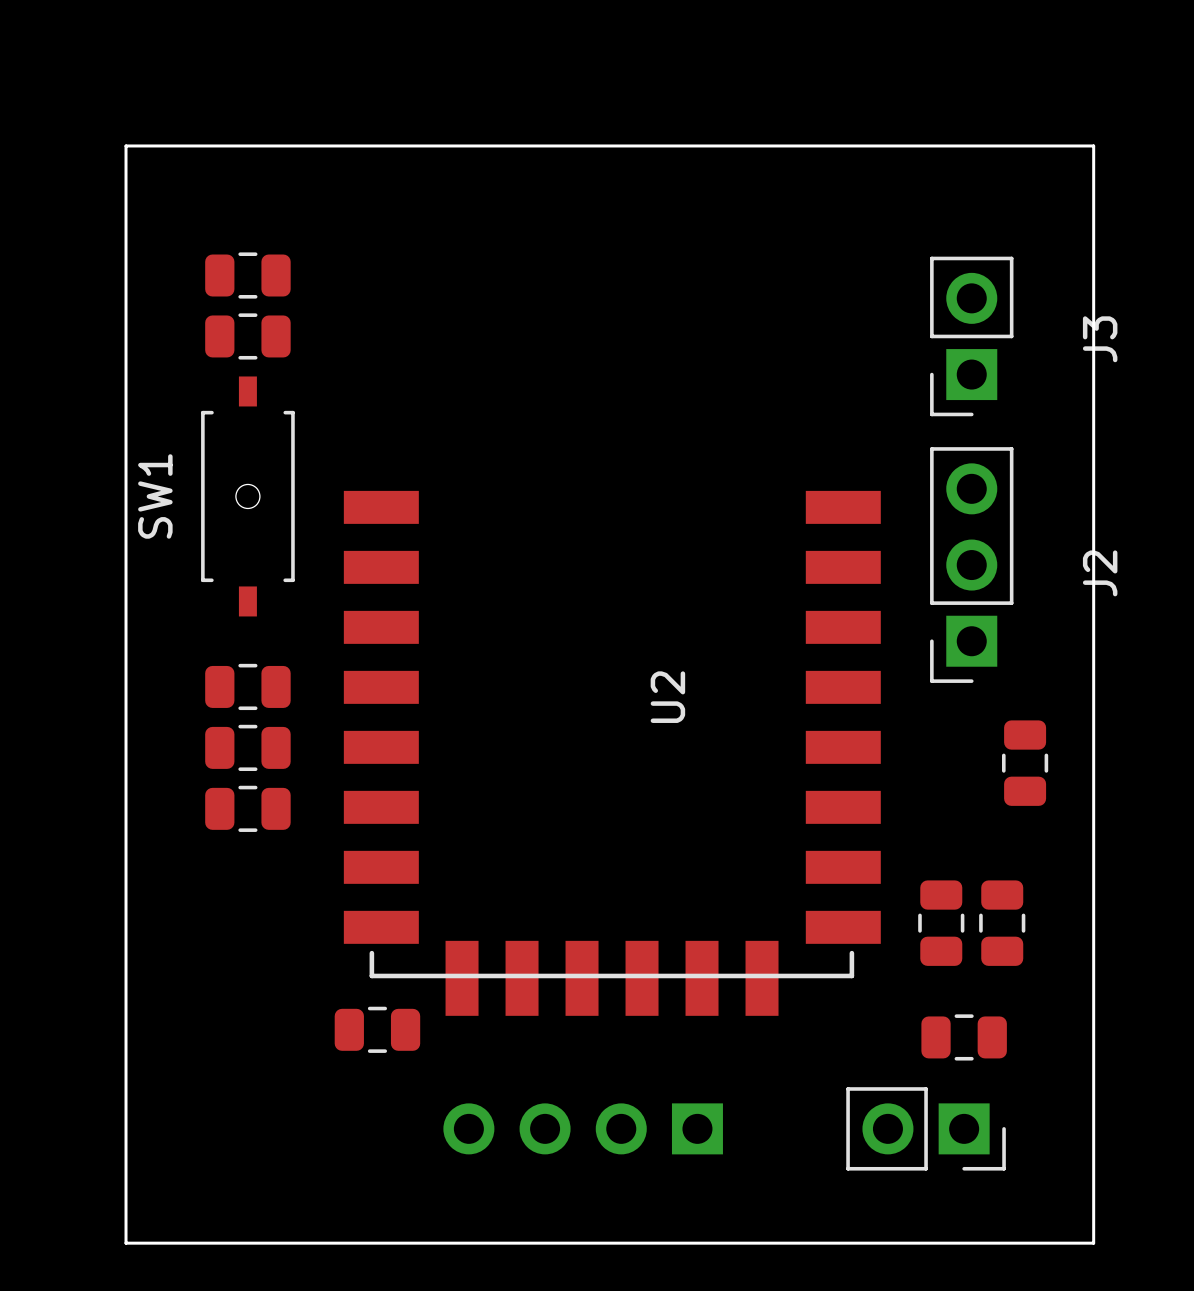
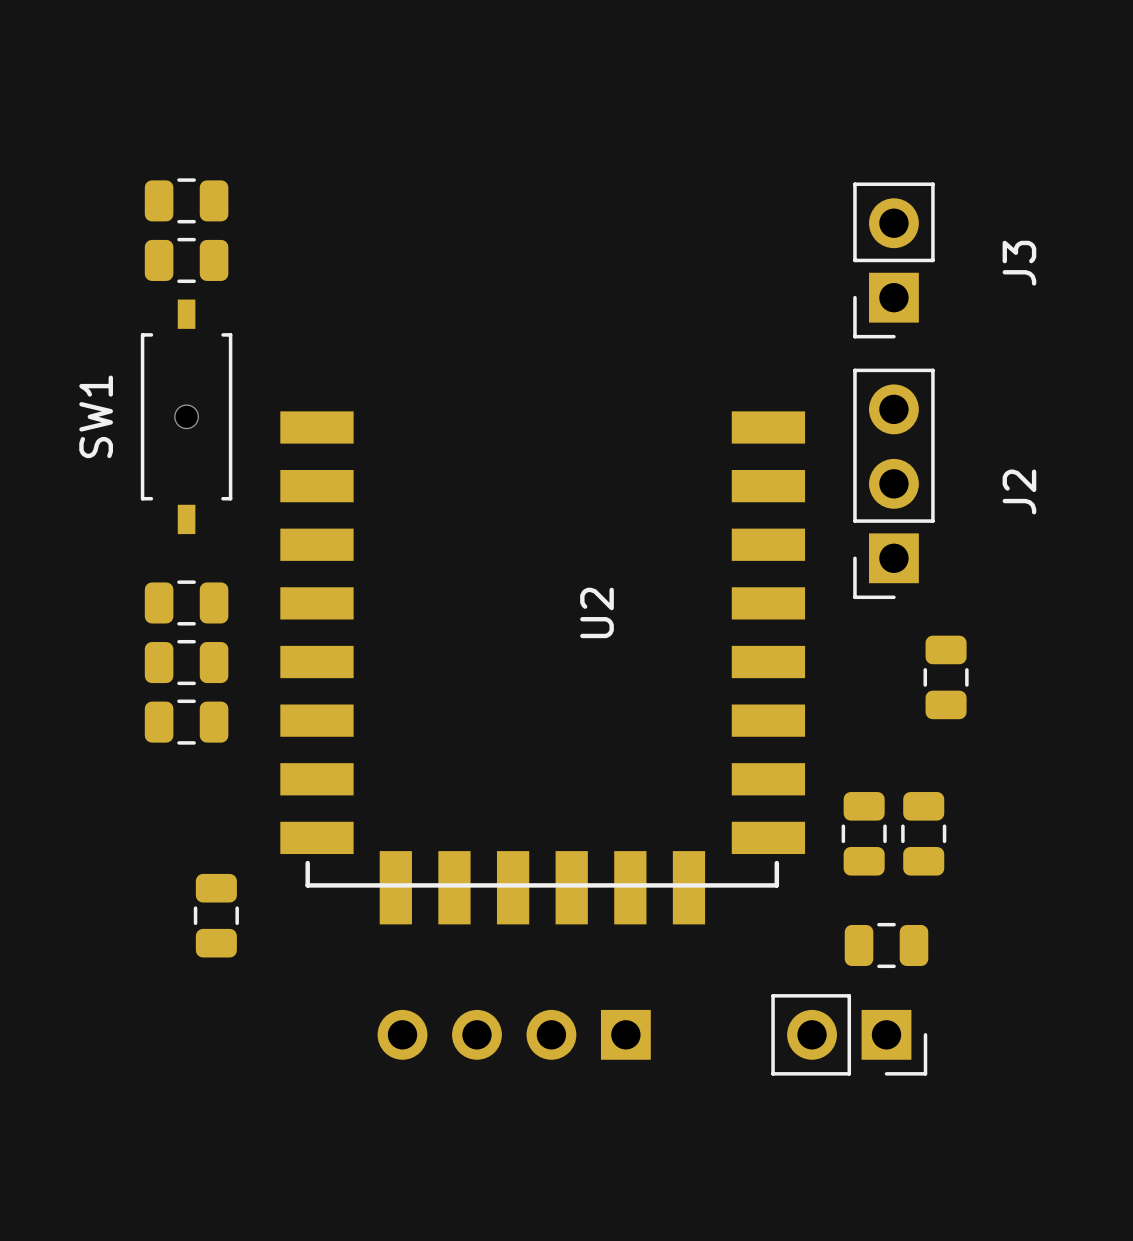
board edge: (126, 145) (1093, 145) (1093, 1243) (126, 1243) (126, 145) -> none
part rotation: 0° (377, 1029) -> 90° clockwise (216, 915)
part position: (377, 1029) -> (216, 915)

